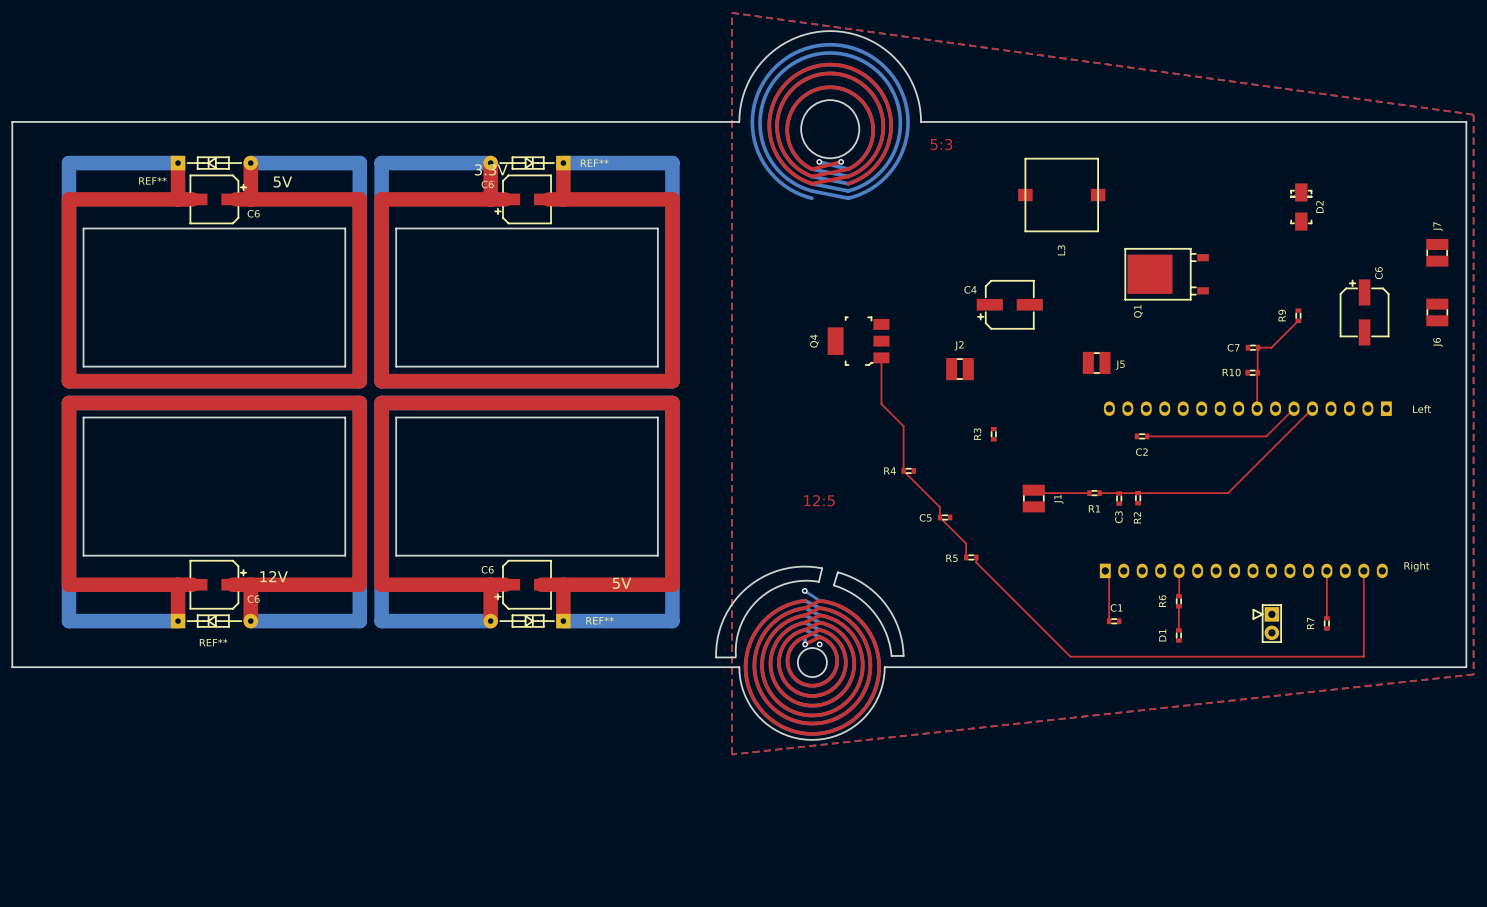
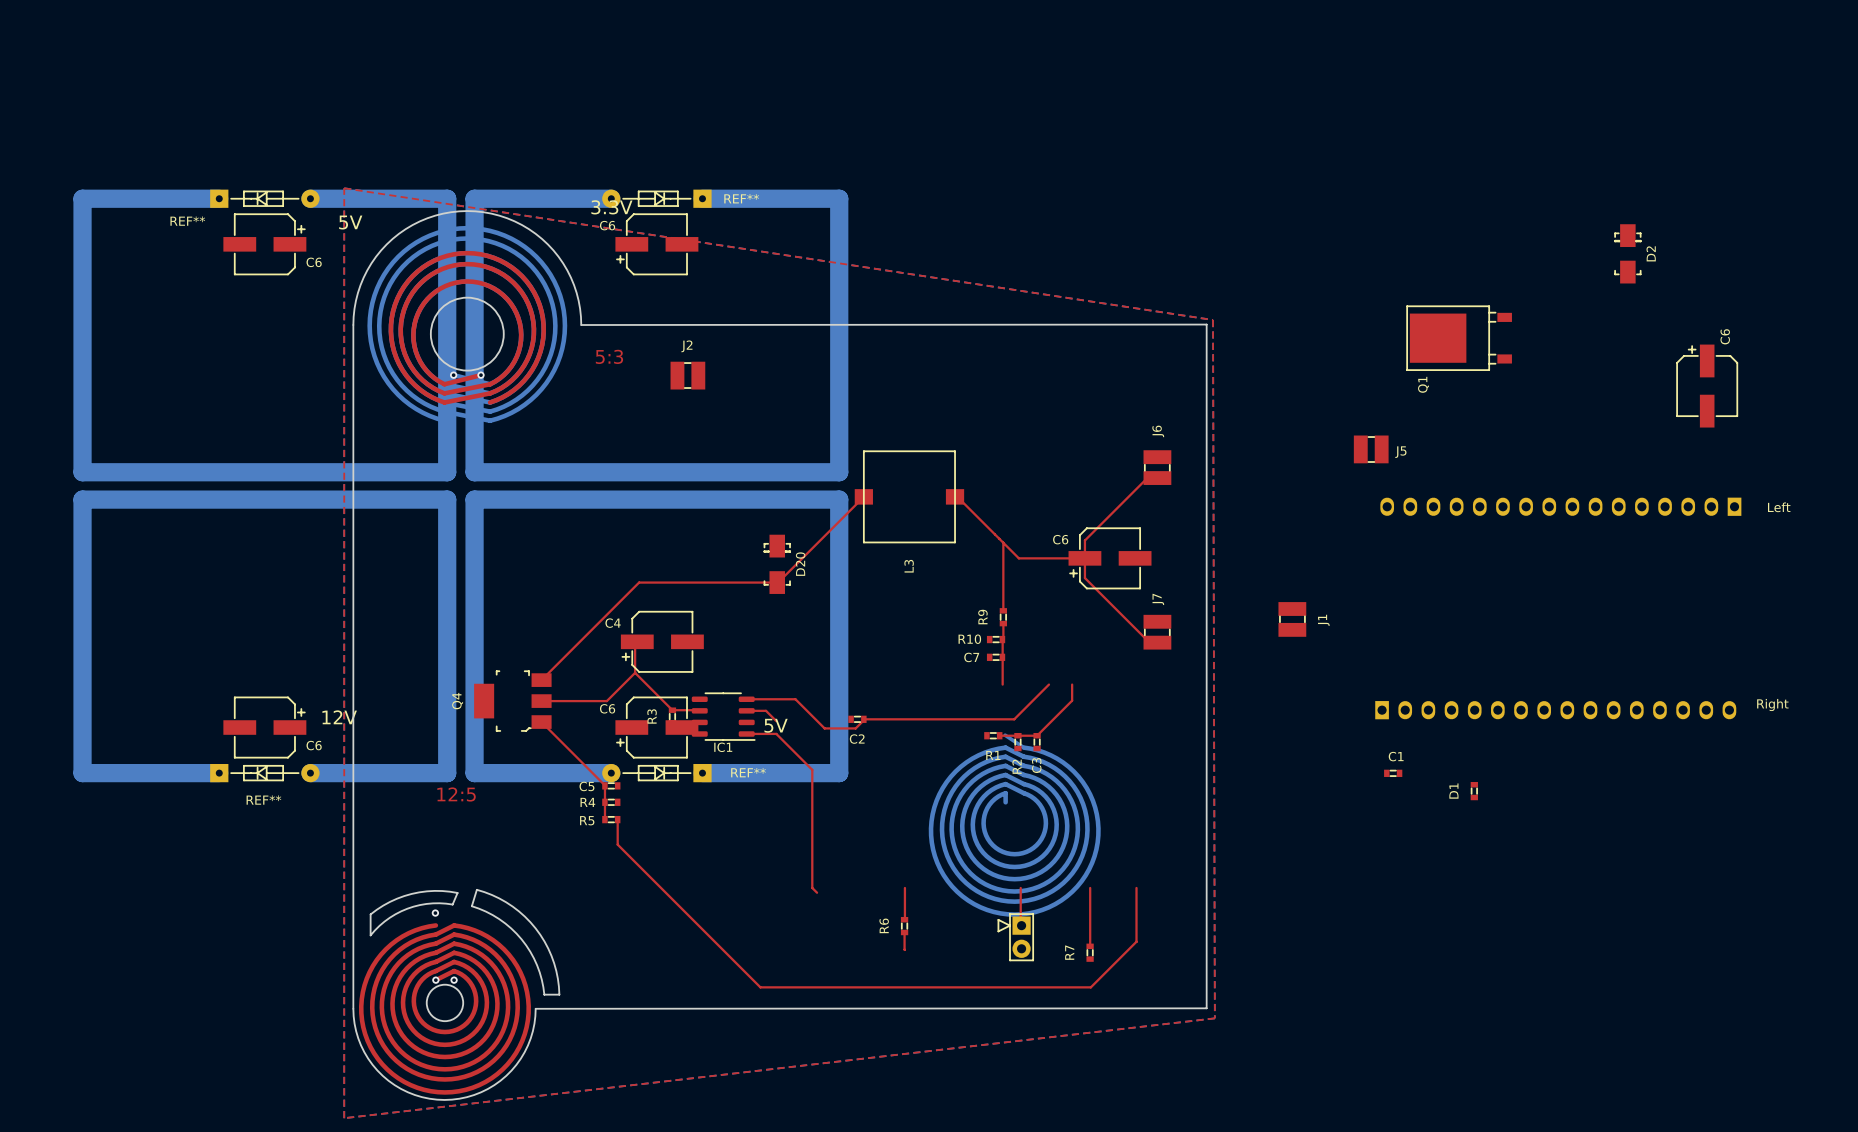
top zone outline: (732, 12) (732, 754) (1473, 674) (1473, 114) (732, 12) -> none
round board edge: [800, 99, 861, 160] -> none
board edge: (12, 121) (12, 667) (739, 667) (745, 696) (762, 720) (788, 735) (812, 739) (841, 733) (865, 716) (880, 690) (884, 667) (1466, 667) (1466, 121) (921, 121) (919, 102) (912, 84) (894, 57) (879, 45) (861, 36) (830, 31) (798, 36) (781, 45) (765, 57) (747, 84) (741, 102) (739, 121) (12, 121) -> none
text: 5:3 (941, 144) -> none
top zone outline: none -> (344, 188) (344, 1118) (1214, 1018) (1213, 319) (344, 188)
bottom track: (819, 161) (848, 169) (859, 161) (871, 143) (873, 129) (870, 116) (858, 98) (839, 88) (821, 88) (801, 98) (791, 112) (787, 125) (788, 138) (792, 151) (800, 161) (812, 169) (848, 176) (865, 165) (878, 149) (883, 130) (880, 109) (867, 88) (845, 75) (820, 74) (797, 85) (786, 96) (779, 109) (777, 135) (782, 149) (790, 162) (812, 176) (848, 183) (867, 173) (878, 162) (888, 143) (891, 127) (889, 111) (877, 87) (856, 70) (840, 65) (824, 64) (799, 73) (786, 83) (776, 96) (770, 111) (769, 127) (773, 148) (781, 162) (792, 173) (806, 181) (848, 191) (869, 181) (882, 170) (892, 155) (899, 134) (900, 116) (896, 99) (888, 84) (868, 64) (841, 53) (813, 55) (796, 61) (778, 75) (768, 89) (762, 105) (759, 122) (761, 139) (768, 155) (782, 174) (806, 189) (848, 198) (870, 188) (885, 177) (896, 163) (905, 140) (907, 110) (896, 81) (875, 59) (848, 46) (818, 45) (789, 56) (767, 76) (754, 104) (753, 134) (763, 163) (784, 185) (812, 198) -> none
via: (819, 161) -> none
top track: (841, 161) (812, 169) (804, 164) (790, 147) (787, 125) (795, 104) (808, 92) (830, 87) (851, 92) (867, 108) (873, 129) (867, 151) (859, 161) (848, 169) (812, 176) (802, 172) (784, 154) (778, 140) (777, 124) (783, 100) (797, 85) (820, 74) (845, 75) (859, 82) (870, 92) (882, 114) (881, 140) (875, 154) (865, 165) (848, 176) (812, 183) (788, 170) (778, 157) (771, 143) (769, 121) (776, 96) (794, 75) (814, 66) (840, 65) (861, 73) (877, 87) (887, 105) (891, 127) (884, 153) (871, 170) (848, 183) -> none
via: (841, 161) -> none
top track: (178, 163) (178, 199) -> none
top track: (250, 163) (250, 199) -> none
top track: (490, 163) (490, 199) -> none
top track: (563, 163) (563, 199) -> none
L3 position: (1061, 195) -> (909, 496)
top track: (192, 199) (68, 199) (68, 381) (359, 381) (359, 199) (236, 199) -> none
top track: (505, 199) (381, 199) (381, 381) (672, 381) (672, 199) (548, 199) -> none
board edge: (83, 228) (345, 228) (345, 366) (83, 366) (83, 228) -> none
board edge: (396, 228) (396, 366) (657, 366) (657, 228) (396, 228) -> none
round board edge: none -> [429, 296, 505, 372]
J7 position: (1437, 252) -> (1157, 632)
board edge: none -> (1206, 324) (1206, 1008) (535, 1008) (532, 1031) (520, 1058) (500, 1080) (474, 1095) (452, 1099) (422, 1097) (401, 1088) (377, 1070) (364, 1052) (358, 1038) (353, 1008) (353, 325) (355, 300) (363, 277) (376, 256) (392, 238) (419, 221) (451, 212) (483, 212) (514, 221) (541, 238) (563, 263) (576, 292) (581, 325) (1206, 324)
text: none -> 5:3 (609, 356)
bottom track: none -> (453, 375) (490, 384) (504, 374) (514, 361) (520, 346) (520, 329) (518, 318) (510, 303) (503, 295) (489, 286) (478, 282) (456, 282) (440, 288) (431, 295) (420, 308) (414, 323) (414, 346) (420, 361) (430, 374) (444, 384) (490, 393) (511, 380) (527, 359) (533, 335) (530, 309) (522, 292) (513, 282) (503, 274) (486, 266) (467, 264) (454, 265) (436, 271) (425, 278) (412, 292) (404, 309) (401, 322) (401, 341) (407, 359) (414, 370) (427, 384) (444, 393) (490, 402) (514, 390) (532, 370) (540, 351) (543, 331) (541, 311) (537, 298) (526, 281) (511, 267) (500, 260) (480, 254) (460, 253) (440, 257) (428, 263) (412, 276) (400, 292) (393, 311) (390, 331) (396, 357) (406, 375) (420, 390) (438, 400) (490, 411) (516, 399) (532, 385) (545, 367) (554, 340) (555, 318) (552, 304) (544, 284) (531, 266) (515, 252) (502, 245) (481, 239) (460, 238) (445, 241) (425, 249) (407, 261) (393, 278) (382, 304) (379, 333) (383, 354) (393, 373) (406, 390) (418, 399) (437, 409) (490, 420) (511, 412) (536, 394) (550, 376) (562, 348) (564, 325) (563, 310) (557, 288) (550, 274) (541, 262) (524, 246) (504, 235) (490, 230) (474, 228) (452, 229) (429, 235) (416, 242) (403, 251) (388, 268) (380, 281) (372, 303) (369, 318) (370, 341) (377, 363) (384, 376) (398, 394) (409, 404) (429, 416) (444, 420)
via: none -> (453, 375)
top track: none -> (480, 375) (444, 384) (434, 378) (423, 366) (417, 356) (414, 346) (413, 329) (416, 318) (423, 303) (440, 288) (456, 282) (467, 281) (478, 282) (494, 288) (507, 299) (513, 308) (519, 323) (521, 340) (518, 351) (511, 366) (504, 374) (490, 384) (444, 393) (432, 387) (422, 380) (410, 365) (402, 347) (400, 328) (402, 316) (409, 298) (420, 282) (430, 274) (454, 265) (467, 264) (486, 266) (503, 274) (518, 287) (525, 298) (532, 316) (533, 328) (531, 347) (524, 365) (511, 380) (490, 393) (444, 402) (432, 397) (415, 385) (402, 370) (394, 351) (390, 331) (391, 318) (400, 292) (417, 271) (428, 263) (447, 255) (460, 253) (480, 254) (506, 263) (526, 281) (537, 298) (541, 311) (543, 331) (542, 344) (532, 370) (514, 390) (490, 402)
via: none -> (480, 375)
C4 position: (1009, 304) -> (662, 641)
J6 rotation: 0° (1437, 312) -> 180° (1157, 467)
J6 position: (1437, 312) -> (1157, 467)
R9 position: (1298, 315) -> (1003, 617)
top track: (1298, 320) (1271, 347) (1257, 348) (1257, 408) -> none
Q4 position: (858, 341) -> (512, 701)
C7 position: (1252, 347) -> (996, 657)
top track: (881, 357) (881, 404) (903, 426) (903, 470) (939, 507) (939, 517) (966, 543) (966, 557) -> none
J2 position: (959, 369) -> (687, 375)
R10 position: (1252, 372) -> (996, 639)
top track: none -> (1156, 475) (1149, 475) (1084, 540) (1084, 578) (1149, 642) (1156, 642)
top track: none -> (863, 496) (778, 582) (639, 582) (541, 680)
top track: none -> (956, 496) (1018, 558) (1084, 558)
top track: (1294, 408) (1266, 436) (1147, 436) -> none
top track: (1312, 408) (1228, 493) (1138, 493) -> none
board edge: (83, 417) (345, 417) (345, 555) (83, 555) (83, 417) -> none
board edge: (396, 417) (657, 417) (657, 555) (396, 555) (396, 417) -> none
R3 position: (993, 434) -> (672, 716)
C2 position: (1142, 436) -> (857, 719)
top track: none -> (1003, 542) (1003, 610)
C6: none -> (1110, 558)
D20: none -> (777, 564)
R4 position: (908, 470) -> (611, 802)
top track: (1028, 490) (1031, 493) (1089, 493) -> none
R1 position: (1094, 493) -> (993, 735)
top track: (1099, 493) (1136, 493) -> none
C3 position: (1119, 498) -> (1037, 742)
R2 position: (1138, 498) -> (1017, 742)
text: 12:5 (819, 500) -> none
top track: none -> (1003, 622) (1002, 684)
C5 position: (945, 517) -> (611, 785)
top track: none -> (635, 645) (635, 672)
top track: none -> (635, 672) (606, 701) (541, 701)
top track: none -> (635, 672) (672, 710) (699, 710)
top track: none -> (1048, 684) (1014, 719) (864, 719) (855, 728) (824, 728) (795, 699) (746, 699)
top track: none -> (1072, 684) (1072, 700) (1037, 735) (999, 735)
R5 position: (971, 557) -> (611, 819)
top track: (976, 557) (976, 562) (1070, 656) (1363, 656) (1363, 570) -> none
top track: (1105, 570) (1109, 574) (1109, 621) -> none
top track: (1179, 570) (1178, 596) -> none
top track: (1326, 570) (1326, 616) (1329, 619) -> none
top track: none -> (746, 710) (766, 710) (776, 721)
board edge: (837, 572) (833, 585) (850, 592) (869, 607) (883, 627) (891, 655) (903, 655) (899, 631) (884, 603) (861, 582) (837, 572) -> none
IC1: none -> (723, 716)
top track: none -> (541, 722) (604, 785) (604, 820)
top track: (178, 584) (178, 621) -> none
top track: (192, 584) (68, 584) (68, 402) (359, 402) (359, 584) -> none
top track: (232, 584) (356, 584) -> none
top track: (250, 584) (250, 621) -> none
top track: (490, 584) (490, 621) -> none
top track: (505, 584) (381, 584) (381, 402) (672, 402) (672, 584) (541, 584) -> none
top track: (563, 584) (563, 621) -> none
top track: none -> (746, 733) (776, 733) (812, 769) (812, 887) (817, 892)
via: (804, 590) -> none
top track: (805, 600) (778, 609) (758, 628) (746, 654) (747, 681) (758, 707) (780, 725) (806, 733) (834, 730) (854, 719) (871, 697) (879, 670) (874, 643) (863, 623) (850, 612) (836, 604) (819, 600) (785, 614) (765, 631) (757, 645) (754, 661) (755, 677) (760, 692) (769, 705) (782, 715) (796, 721) (812, 723) (837, 717) (854, 705) (867, 682) (870, 661) (866, 645) (859, 631) (848, 620) (834, 612) (819, 608) (782, 624) (772, 634) (765, 647) (762, 671) (766, 685) (773, 697) (784, 707) (797, 713) (817, 715) (839, 707) (856, 689) (862, 671) (862, 656) (857, 642) (841, 624) (819, 615) (796, 625) (779, 638) (772, 649) (770, 663) (772, 676) (778, 688) (795, 701) (816, 705) (833, 699) (846, 688) (853, 671) (853, 654) (848, 641) (835, 629) (819, 622) (793, 634) (781, 650) (778, 662) (780, 674) (787, 684) (796, 692) (812, 695) (828, 692) (840, 681) (844, 670) (845, 658) (841, 646) (834, 637) (819, 629) (796, 641) (789, 651) (788, 667) (792, 676) (800, 682) (809, 685) (821, 683) (831, 676) (836, 664) (834, 649) (825, 639) (819, 637) (805, 644) -> none
R6 position: (1178, 601) -> (904, 926)
top track: (1178, 606) (1178, 630) -> none
part: (1267, 623) -> none
R7 position: (1326, 623) -> (1090, 952)
text: none -> 12:5 (456, 794)
via: (805, 644) -> none
via: (819, 644) -> none
round board edge: [797, 647, 828, 678] -> none
board edge: (735, 655) (739, 627) (755, 602) (768, 591) (784, 584) (801, 580) (818, 581) (822, 568) (802, 566) (776, 571) (758, 579) (742, 591) (726, 612) (716, 644) (716, 657) (735, 657) -> none
top track: none -> (617, 819) (617, 844) (760, 987) (1090, 987) (1136, 941) (1136, 887)
top track: none -> (904, 887) (904, 919)
top track: none -> (1020, 887) (1021, 925)
top track: none -> (1090, 887) (1090, 945)
board edge: none -> (476, 889) (471, 906) (492, 915) (516, 933) (530, 951) (537, 965) (544, 994) (559, 994) (556, 971) (551, 955) (535, 928) (512, 906) (499, 898) (476, 889)
board edge: none -> (457, 892) (452, 904) (433, 903) (407, 908) (384, 921) (370, 935) (370, 914) (390, 901) (419, 892) (434, 890) (457, 892)
via: none -> (435, 913)
top track: none -> (435, 925) (415, 930) (402, 936) (391, 944) (376, 960) (369, 972) (362, 992) (361, 1013) (363, 1027) (370, 1047) (378, 1058) (387, 1069) (404, 1081) (417, 1087) (437, 1092) (459, 1091) (472, 1087) (491, 1078) (502, 1069) (519, 1047) (526, 1027) (528, 1013) (527, 992) (523, 978) (513, 960) (493, 940) (474, 930) (454, 925) (435, 934) (410, 942) (394, 954) (385, 964) (376, 981) (372, 1001) (373, 1021) (380, 1039) (391, 1056) (407, 1068) (425, 1076) (444, 1079) (458, 1078) (477, 1072) (498, 1056) (512, 1033) (516, 1021) (517, 1001) (513, 981) (504, 964) (490, 949) (473, 939) (454, 934) (407, 955) (394, 967) (385, 983) (382, 995) (382, 1013) (387, 1031) (396, 1046) (410, 1059) (426, 1066) (444, 1069) (457, 1068) (479, 1059) (493, 1046) (500, 1036) (507, 1013) (507, 1001) (504, 983) (495, 967) (482, 955) (471, 948) (454, 943) (425, 955) (410, 964) (400, 977) (395, 987) (392, 1003) (394, 1019) (402, 1034) (409, 1043) (423, 1052) (444, 1057) (461, 1054) (471, 1049) (487, 1034) (496, 1014) (496, 992) (486, 972) (469, 958) (454, 952) (421, 967) (410, 978) (405, 987) (403, 1002) (405, 1017) (413, 1030) (425, 1039) (444, 1044) (459, 1042) (476, 1030) (485, 1012) (485, 992) (479, 978) (468, 967) (454, 961) (425, 976) (415, 989) (413, 1001) (414, 1009) (420, 1020) (429, 1027) (444, 1032) (456, 1029) (469, 1020) (475, 1005) (475, 997) (472, 985) (461, 974) (454, 971) (435, 980)
top track: none -> (904, 932) (904, 949)
part: none -> (1015, 937)
via: none -> (435, 980)
via: none -> (454, 980)
round board edge: none -> [425, 983, 465, 1023]

